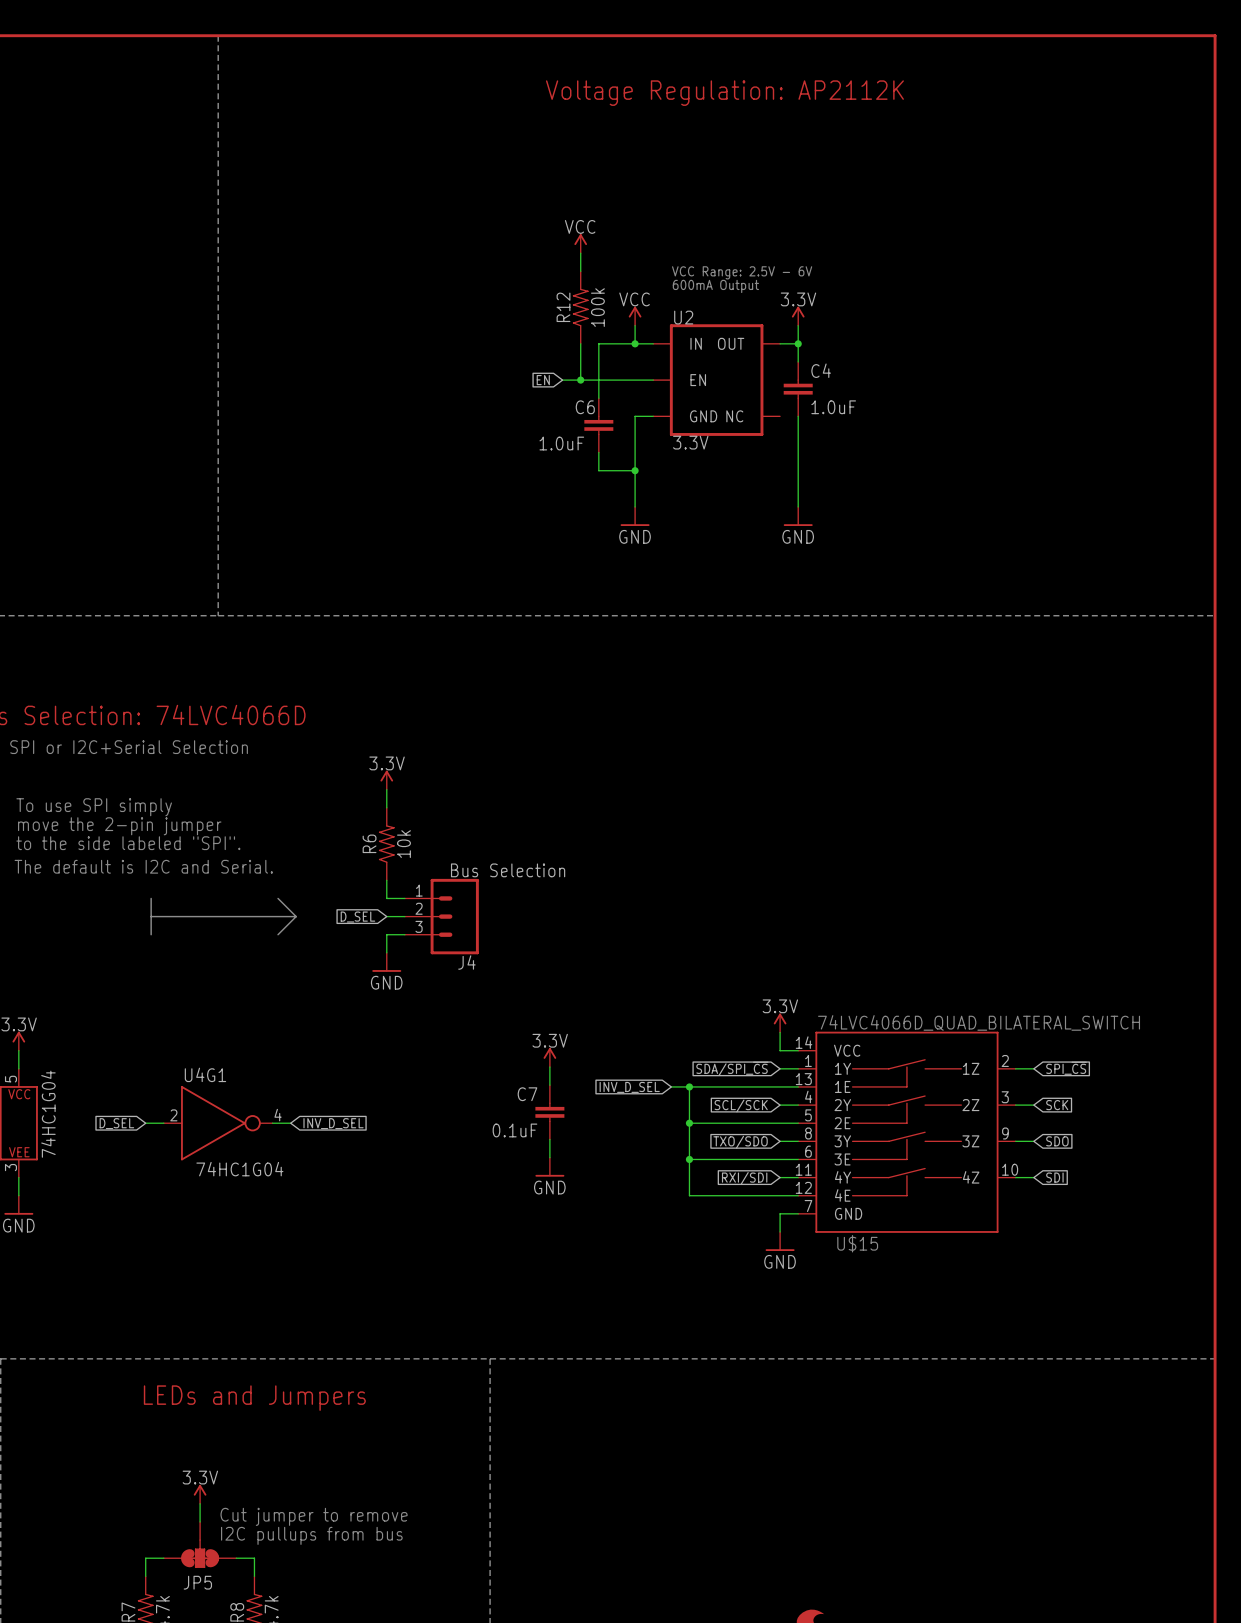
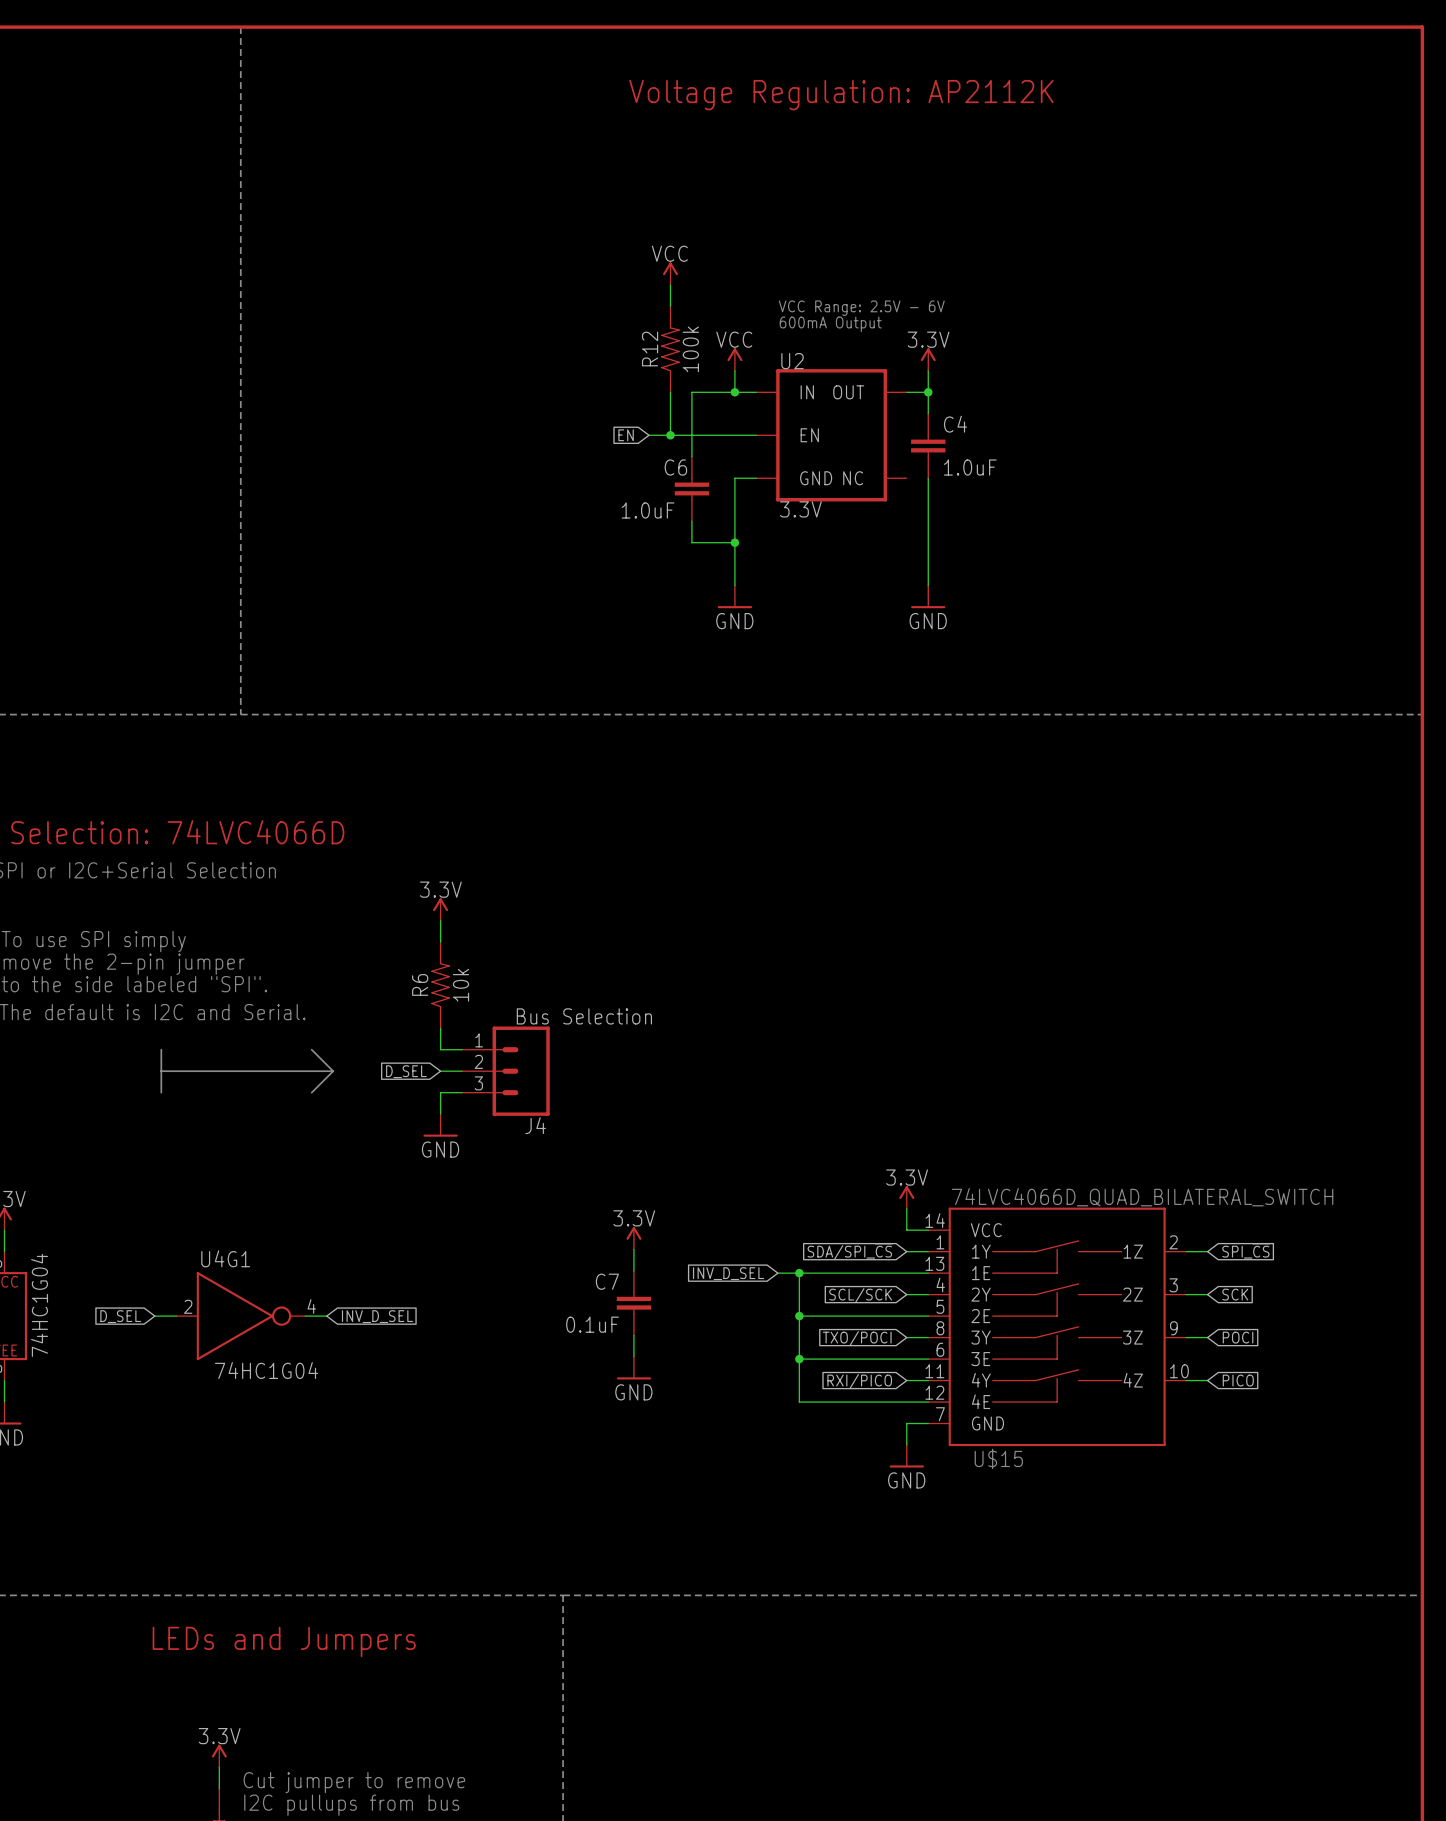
global label: SDO (1057, 1141) -> POCI (1238, 1337)
global label: TXO/SDO (740, 1142) -> TXO/POCI (857, 1338)
global label: SDI (1054, 1177) -> PICO (1238, 1380)
global label: RXI/SDI (744, 1178) -> RXI/PICO (859, 1381)

